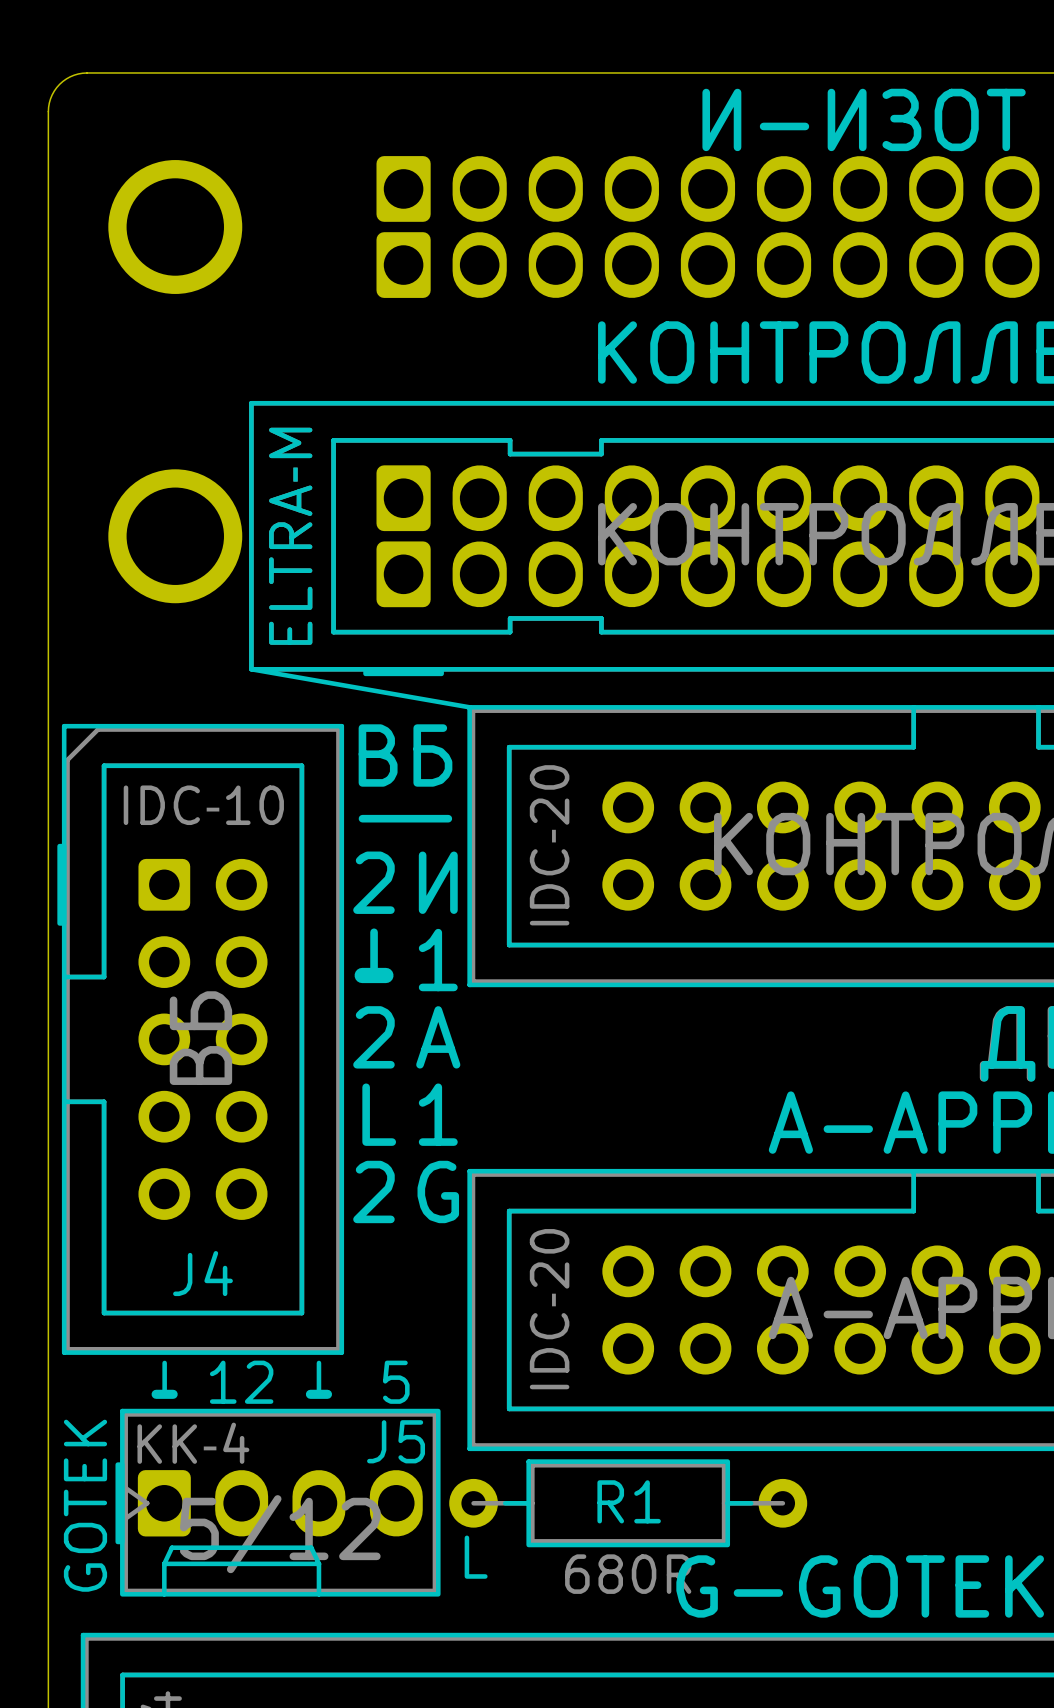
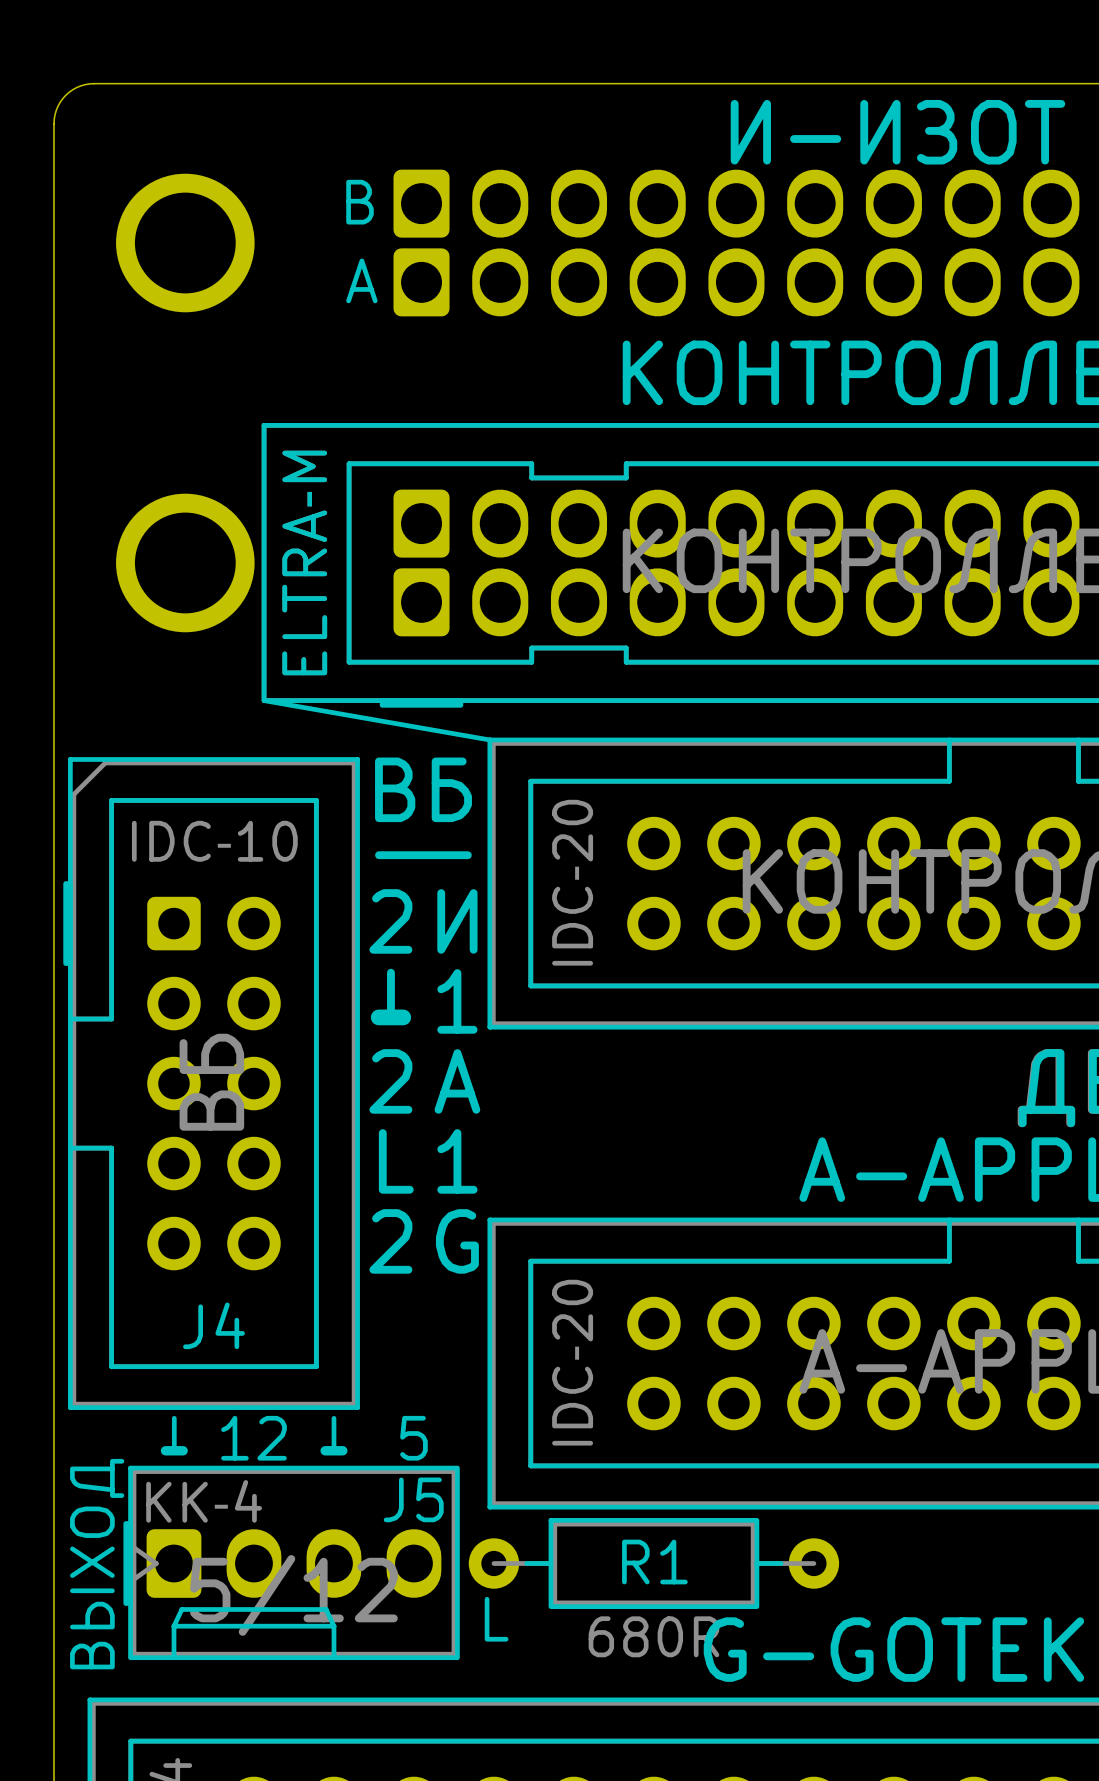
text: none -> B (360, 202)
text: none -> A (361, 280)
text: GOTEK (85, 1505) -> ВЫХОД (97, 1564)

